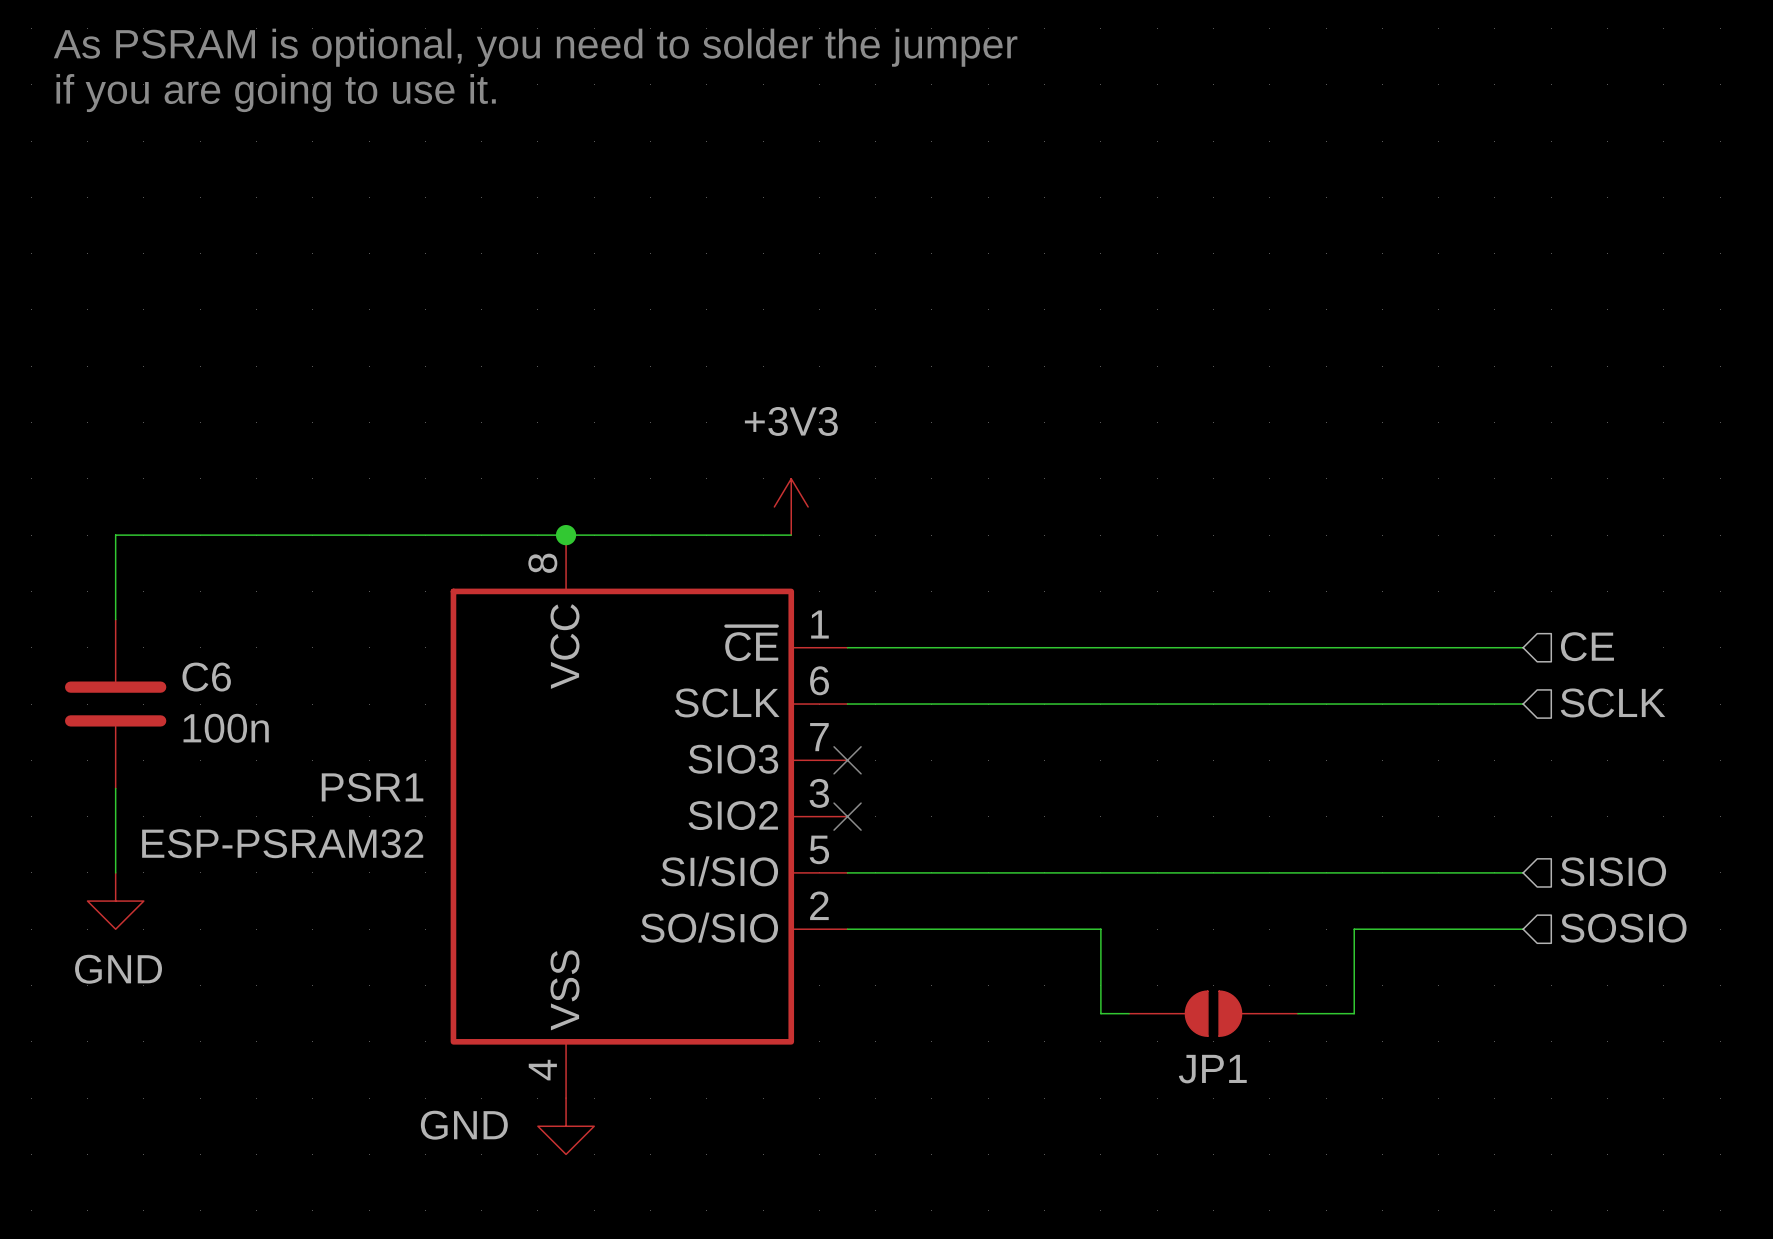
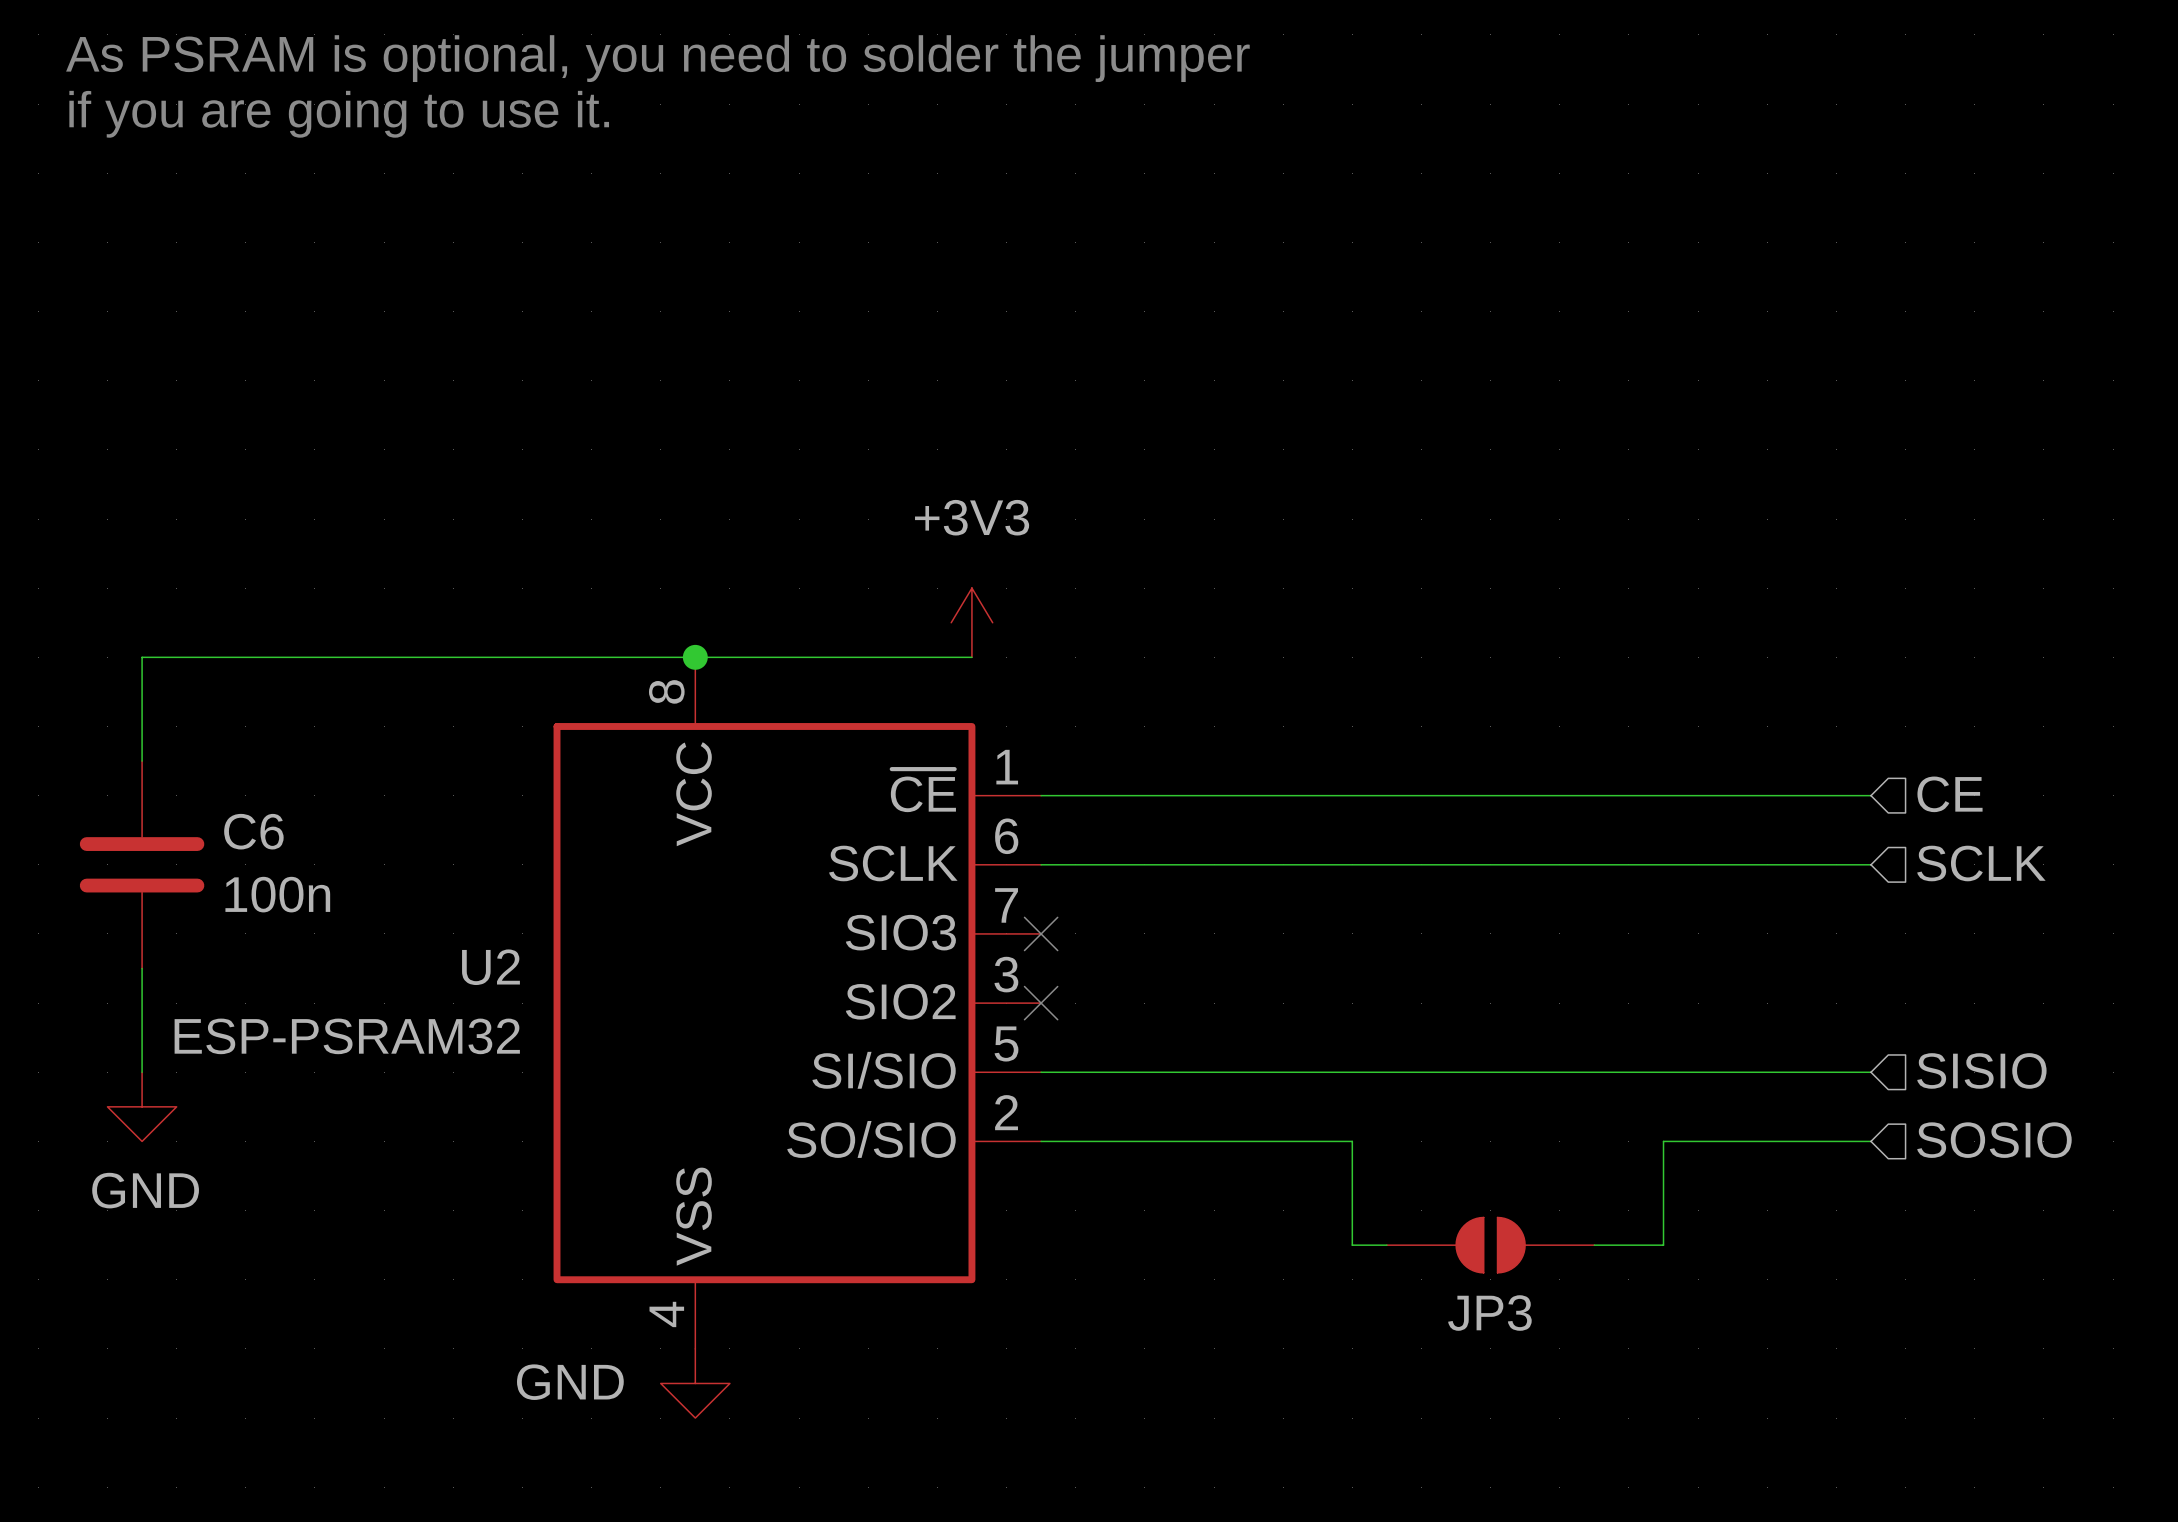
PSR1 name: PSR1 (372, 787) -> U2 (490, 967)
JP1 name: JP1 (1212, 1069) -> JP3 (1489, 1313)

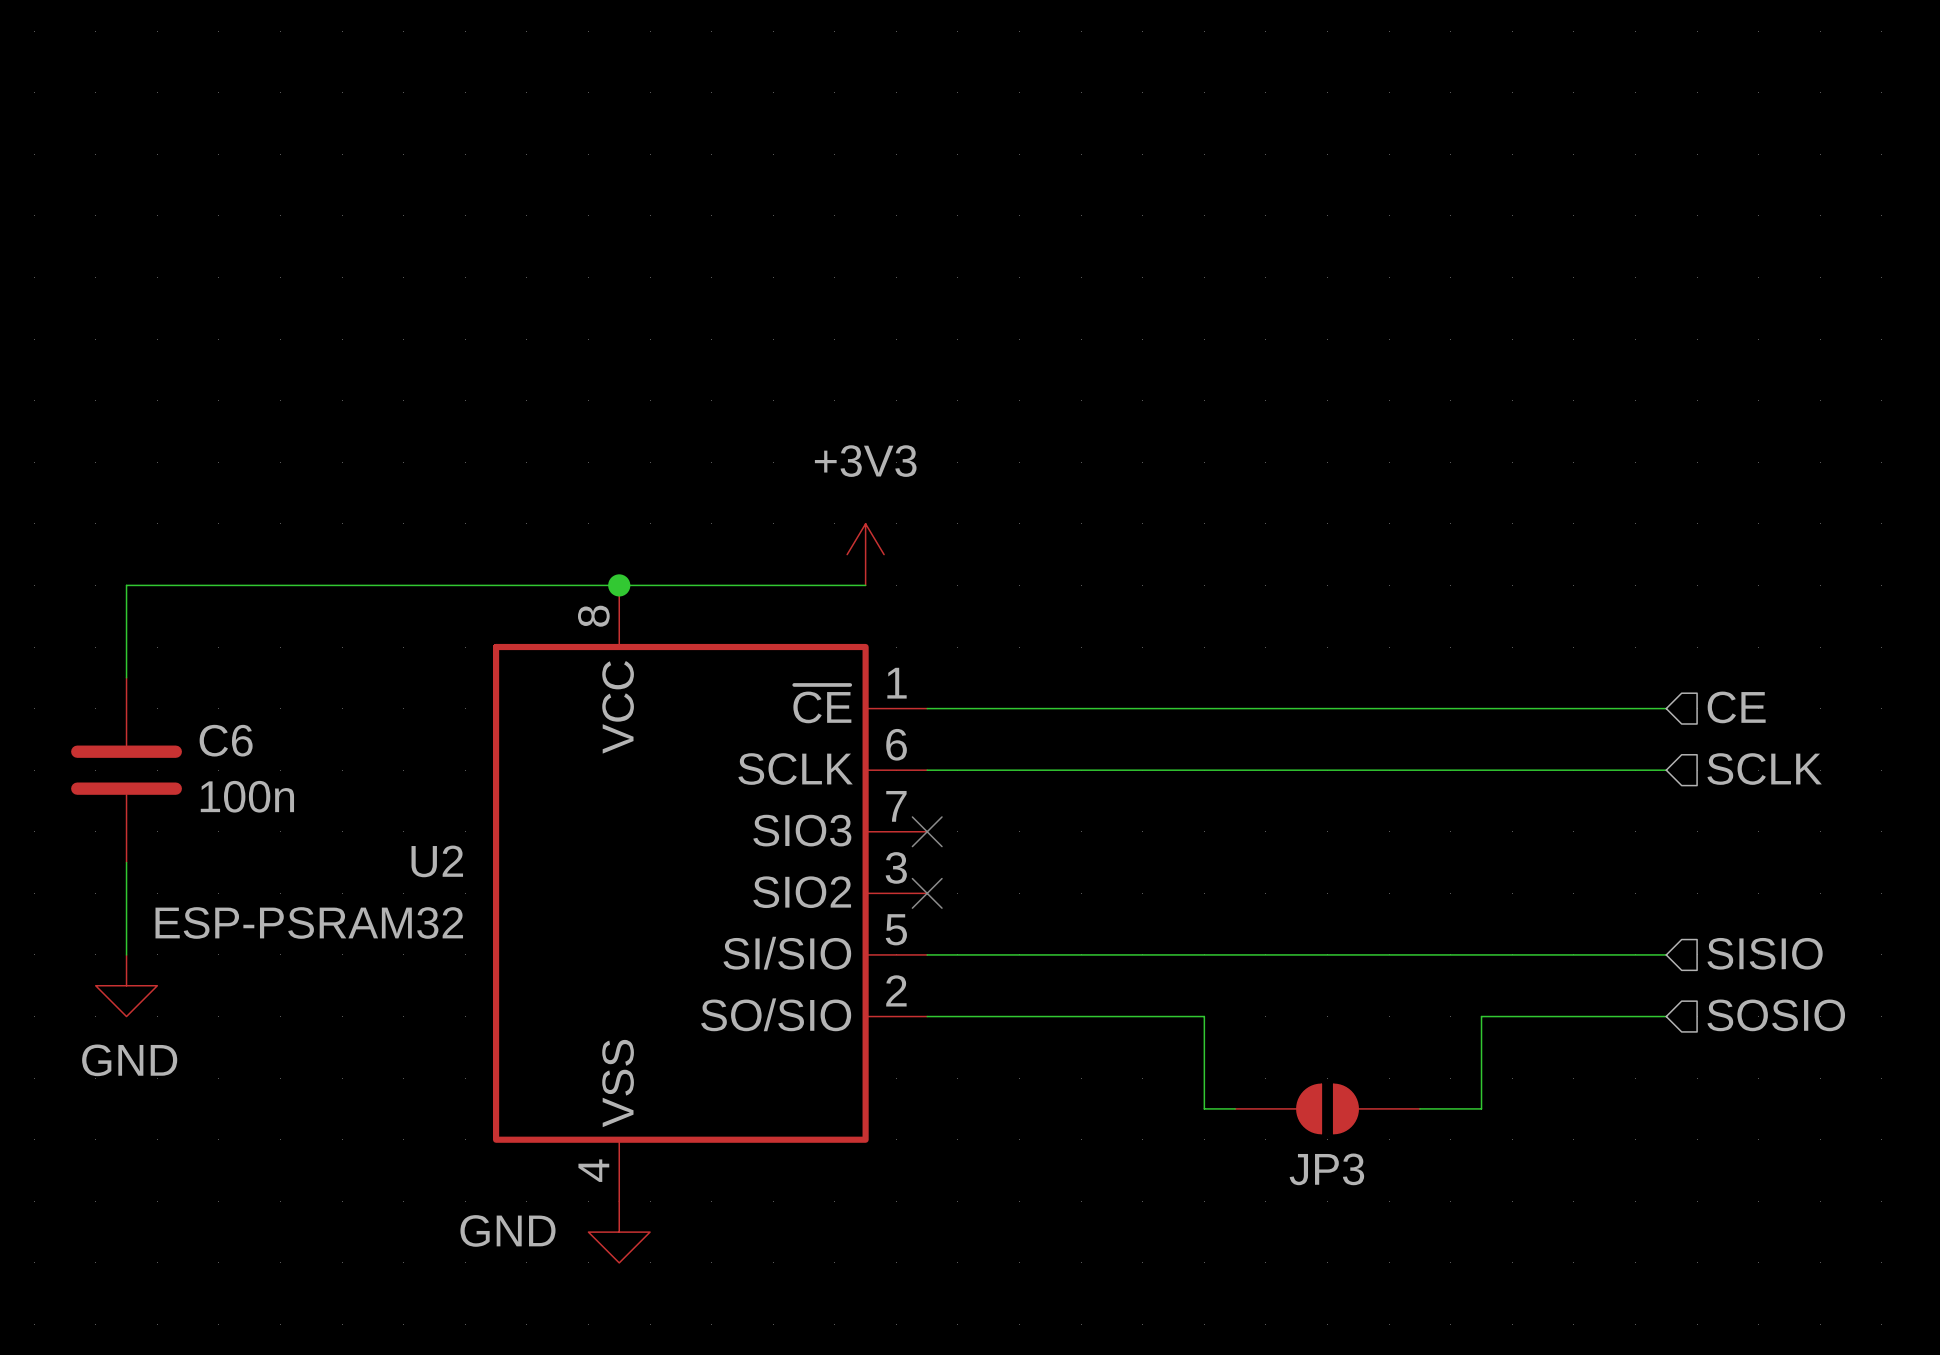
text: As PSRAM is optional, you need to solder the jumper (657, 58) -> none
text: if you are going to use it. (339, 114) -> none

